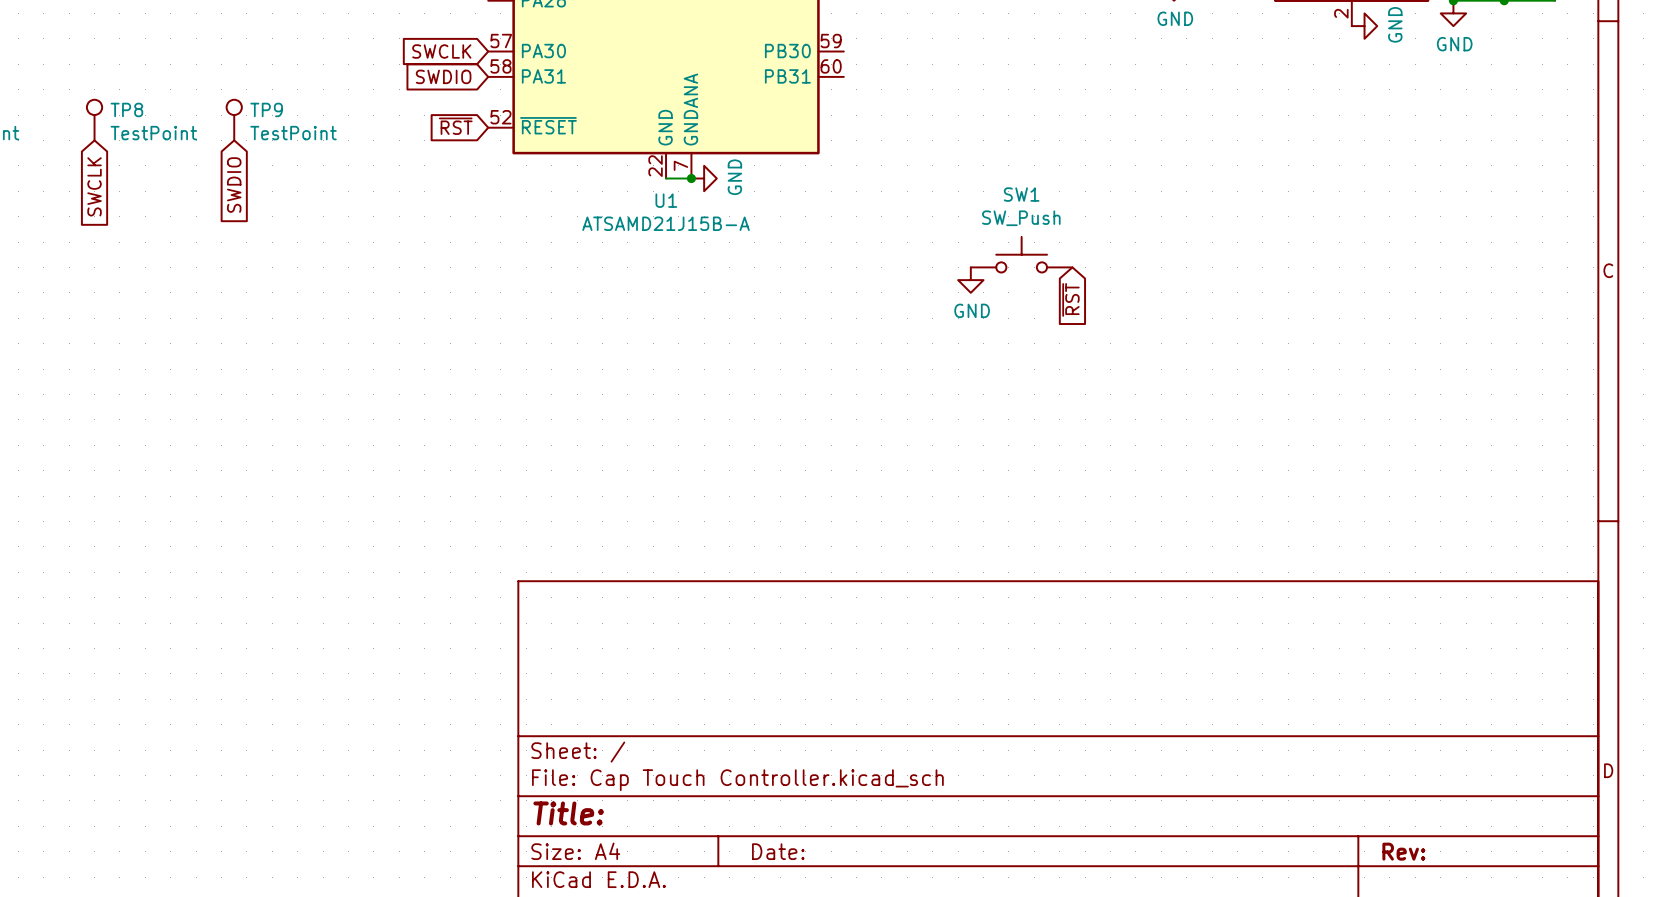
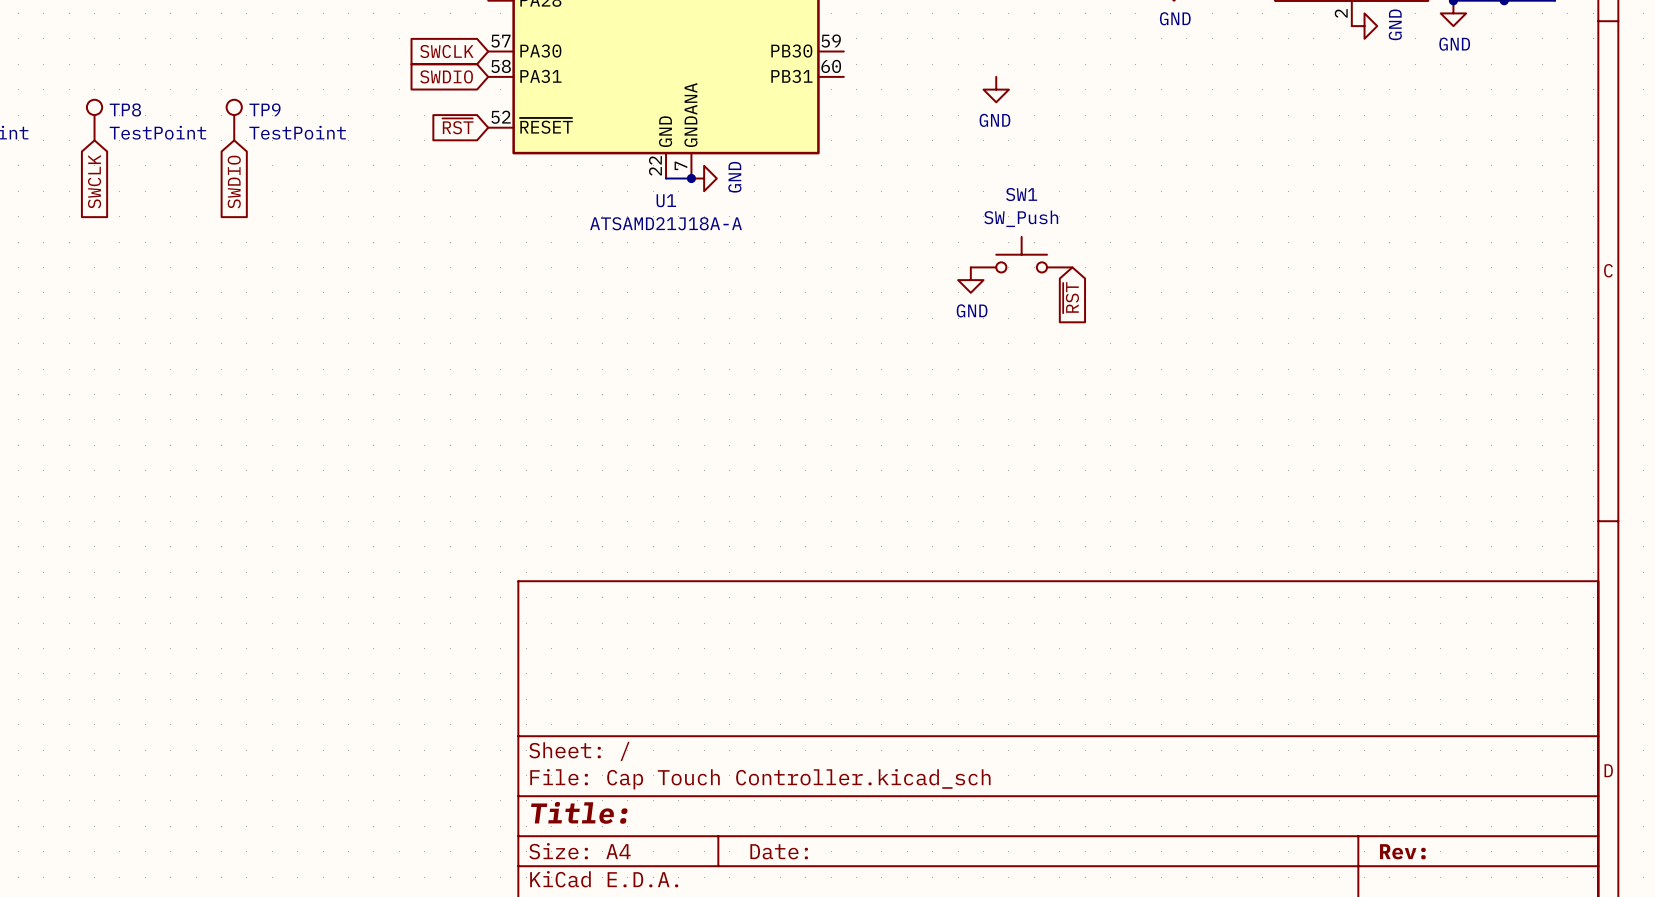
power symbol: none -> GND (996, 89)
U1 value: ATSAMD21J15B-A (666, 223) -> ATSAMD21J18A-A (666, 223)

